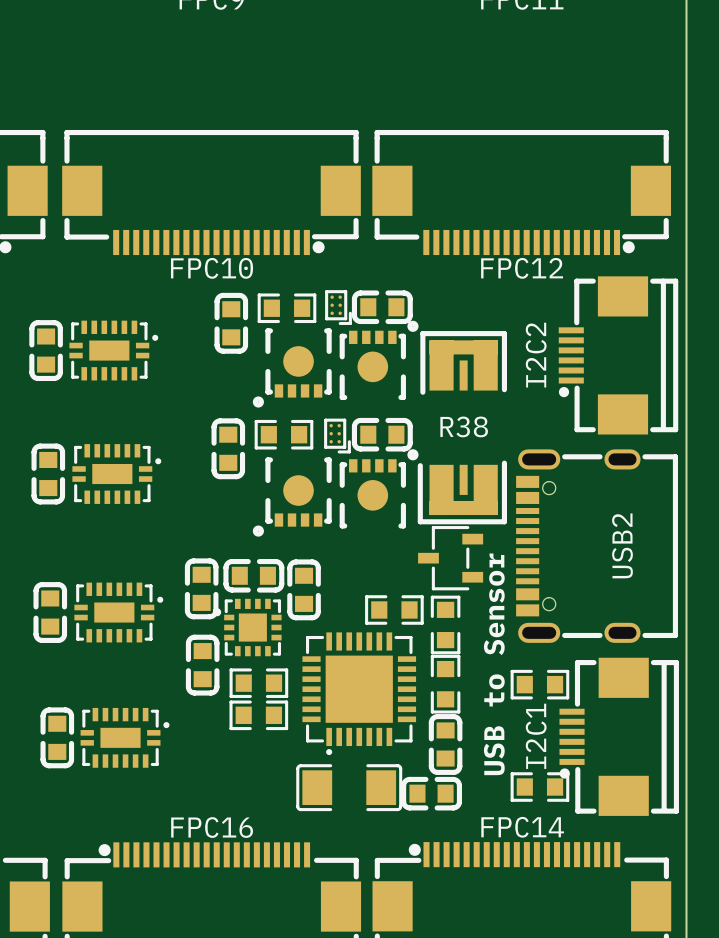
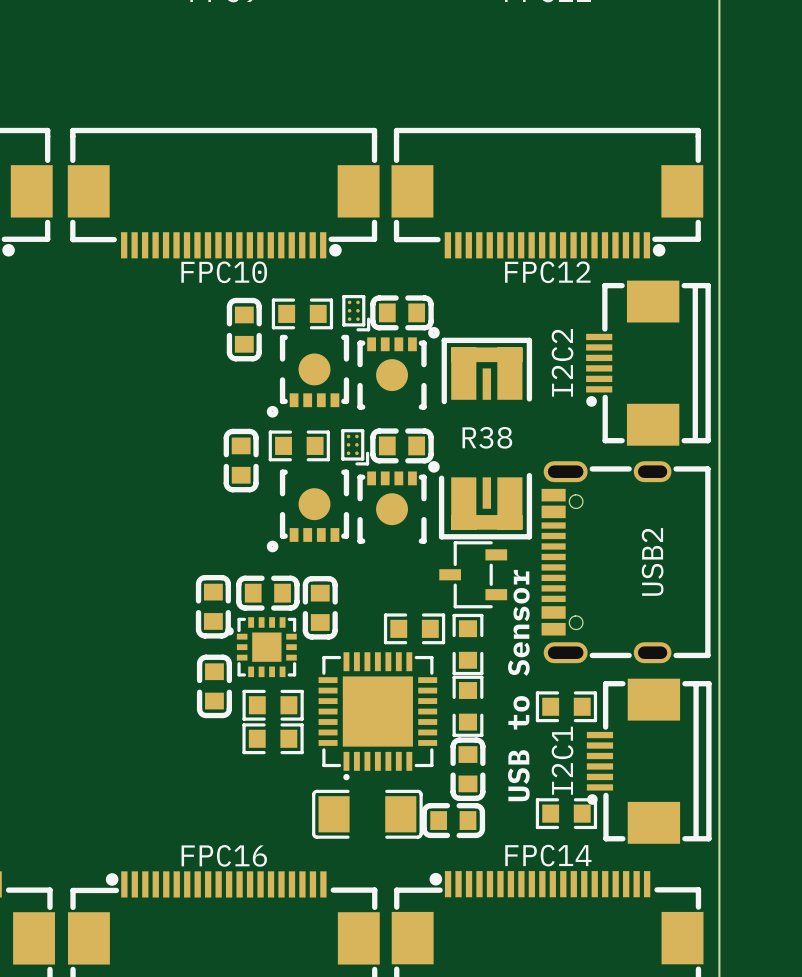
part: (46, 350) -> none
part: (113, 350) -> none
part: (48, 474) -> none
part: (116, 474) -> none
part: (50, 612) -> none
part: (118, 612) -> none
part: (57, 737) -> none
part: (125, 737) -> none

